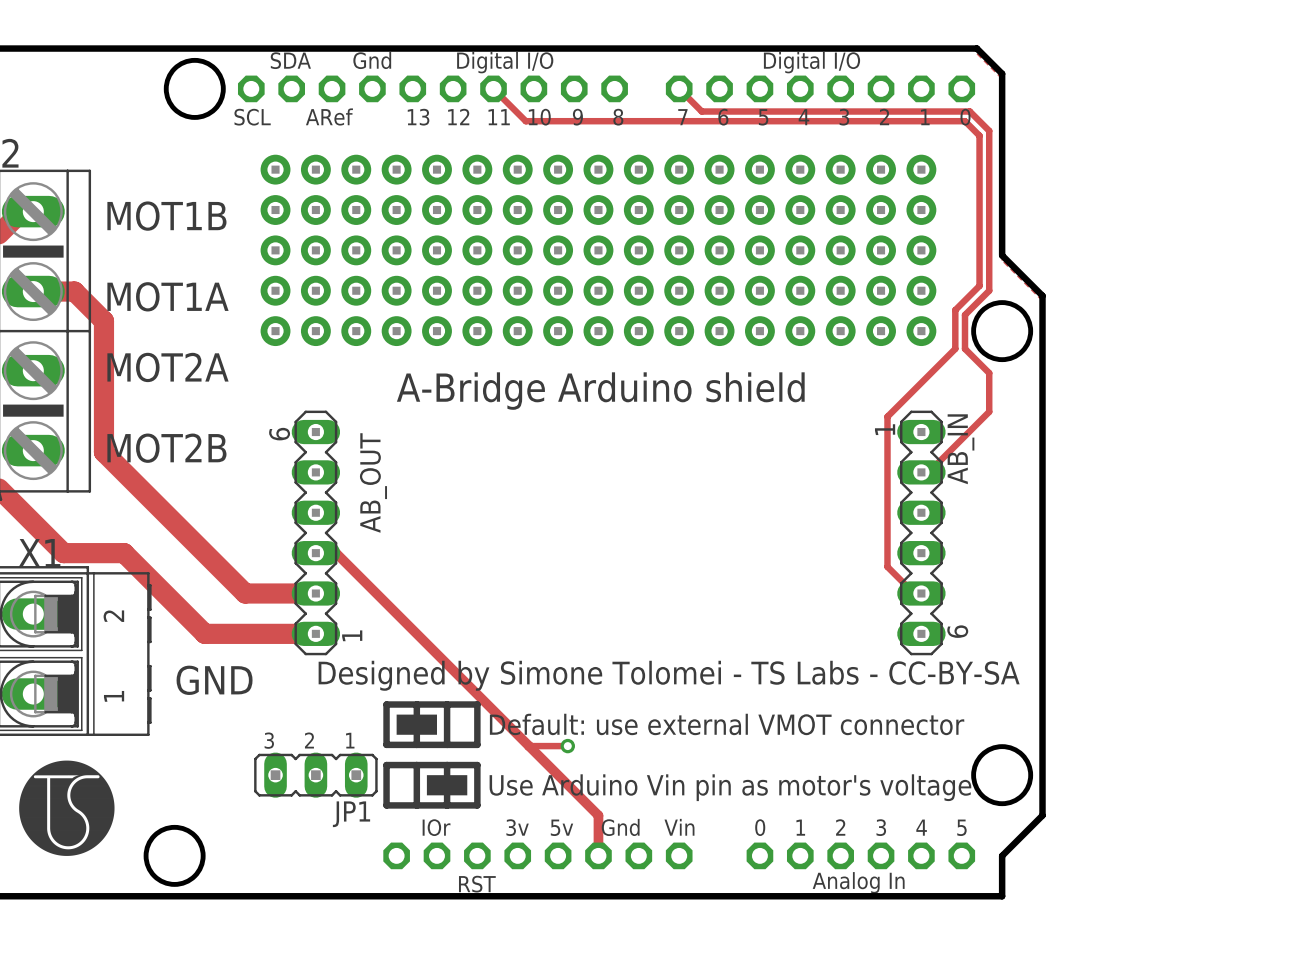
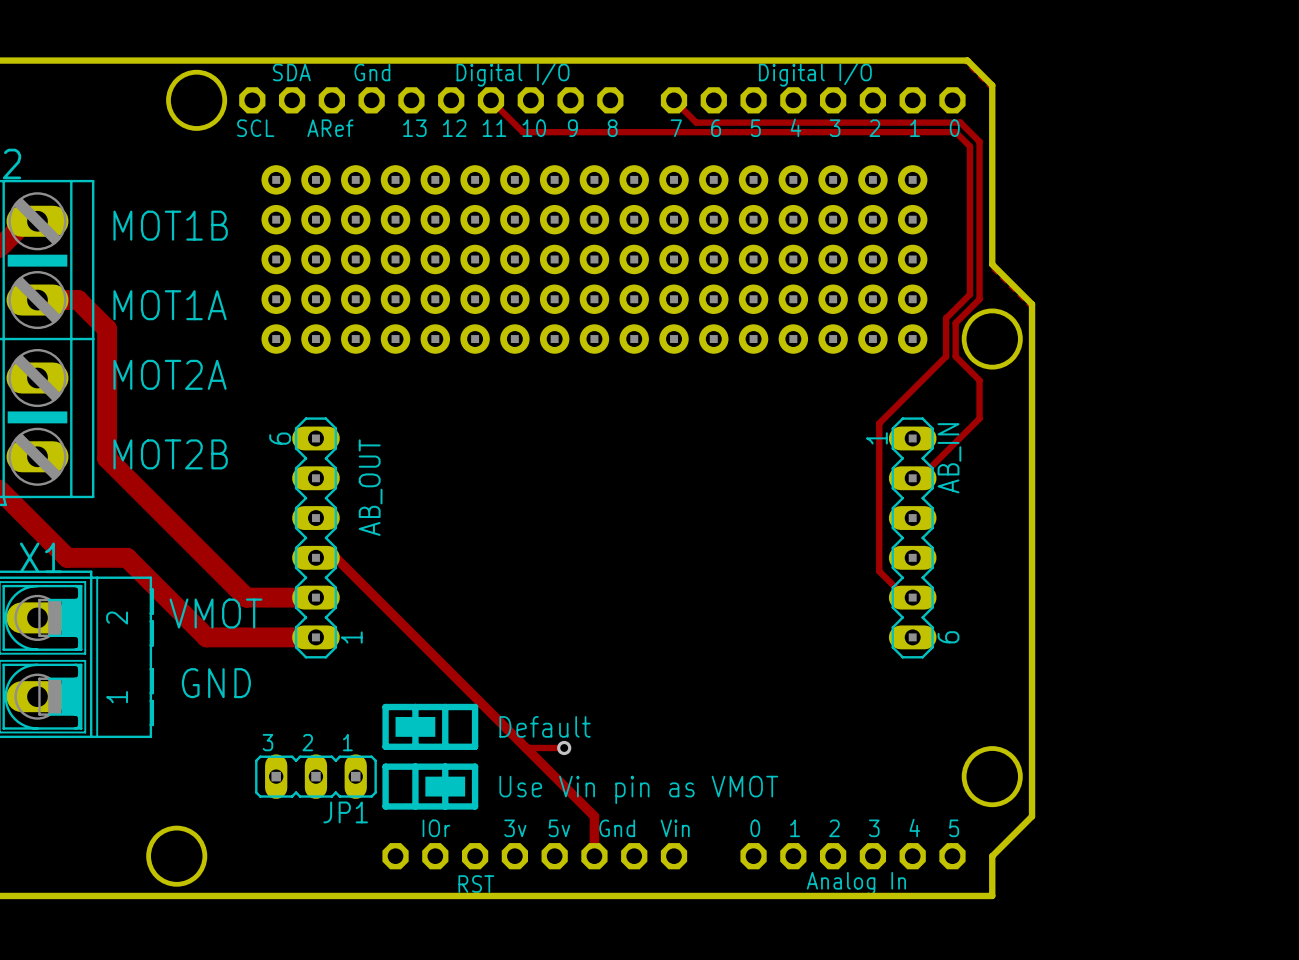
text: A-Bridge Arduino shield (600, 391) -> none
text: none -> VMOT (215, 613)
text: Designed by Simone Tolomei - TS Labs - CC-BY-SA (669, 675) -> none
text: Default: use external VMOT connector (727, 724) -> Default (545, 726)
drawing: [19, 760, 115, 856] -> none
text: Use Arduino Vin pin as motor's voltage (730, 787) -> Use Vin pin as VMOT (638, 789)

